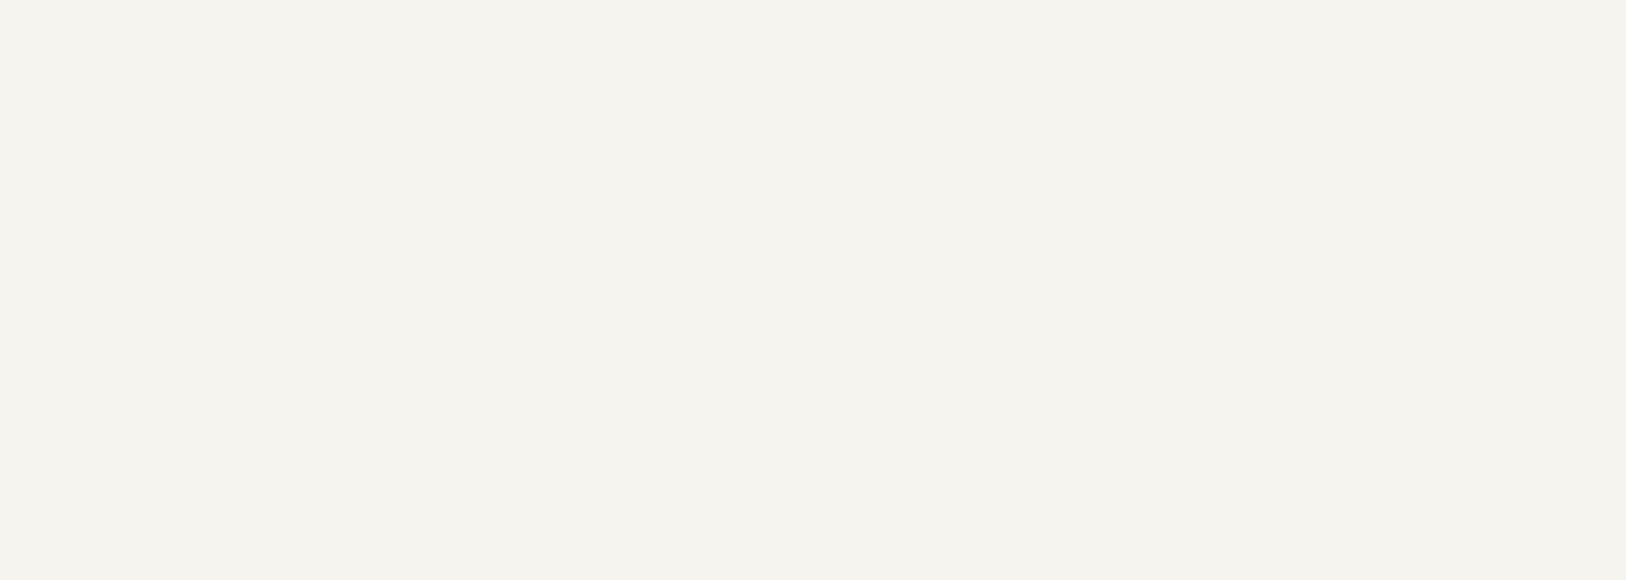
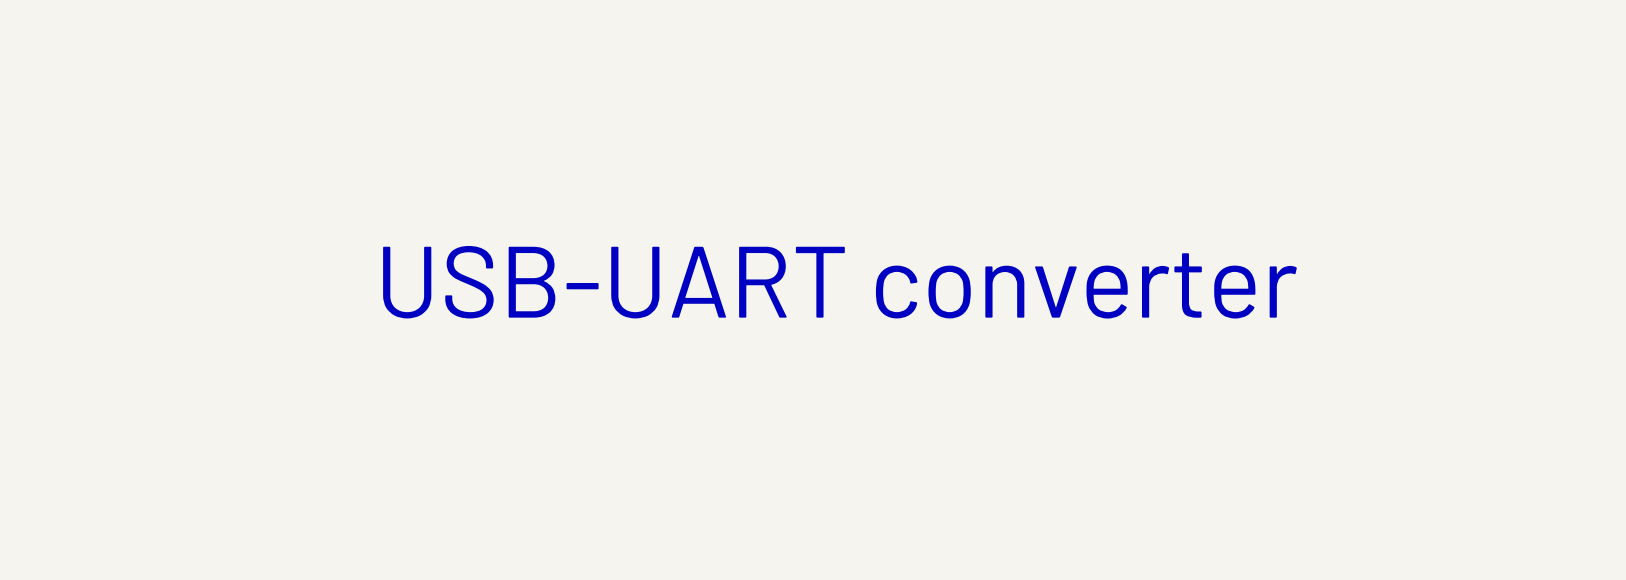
text: none -> USB-UART converter (840, 282)

